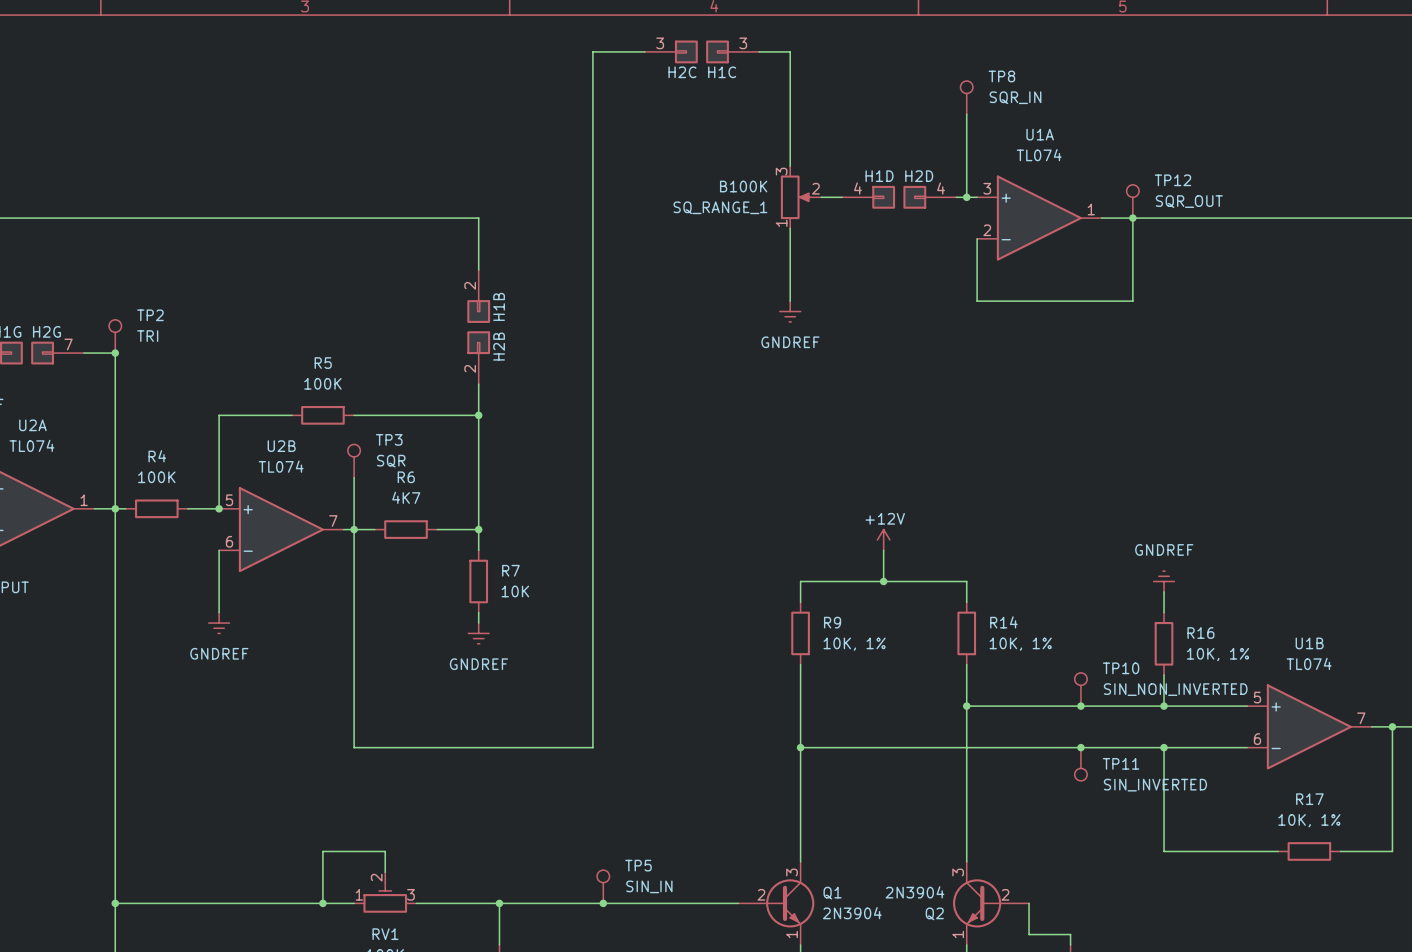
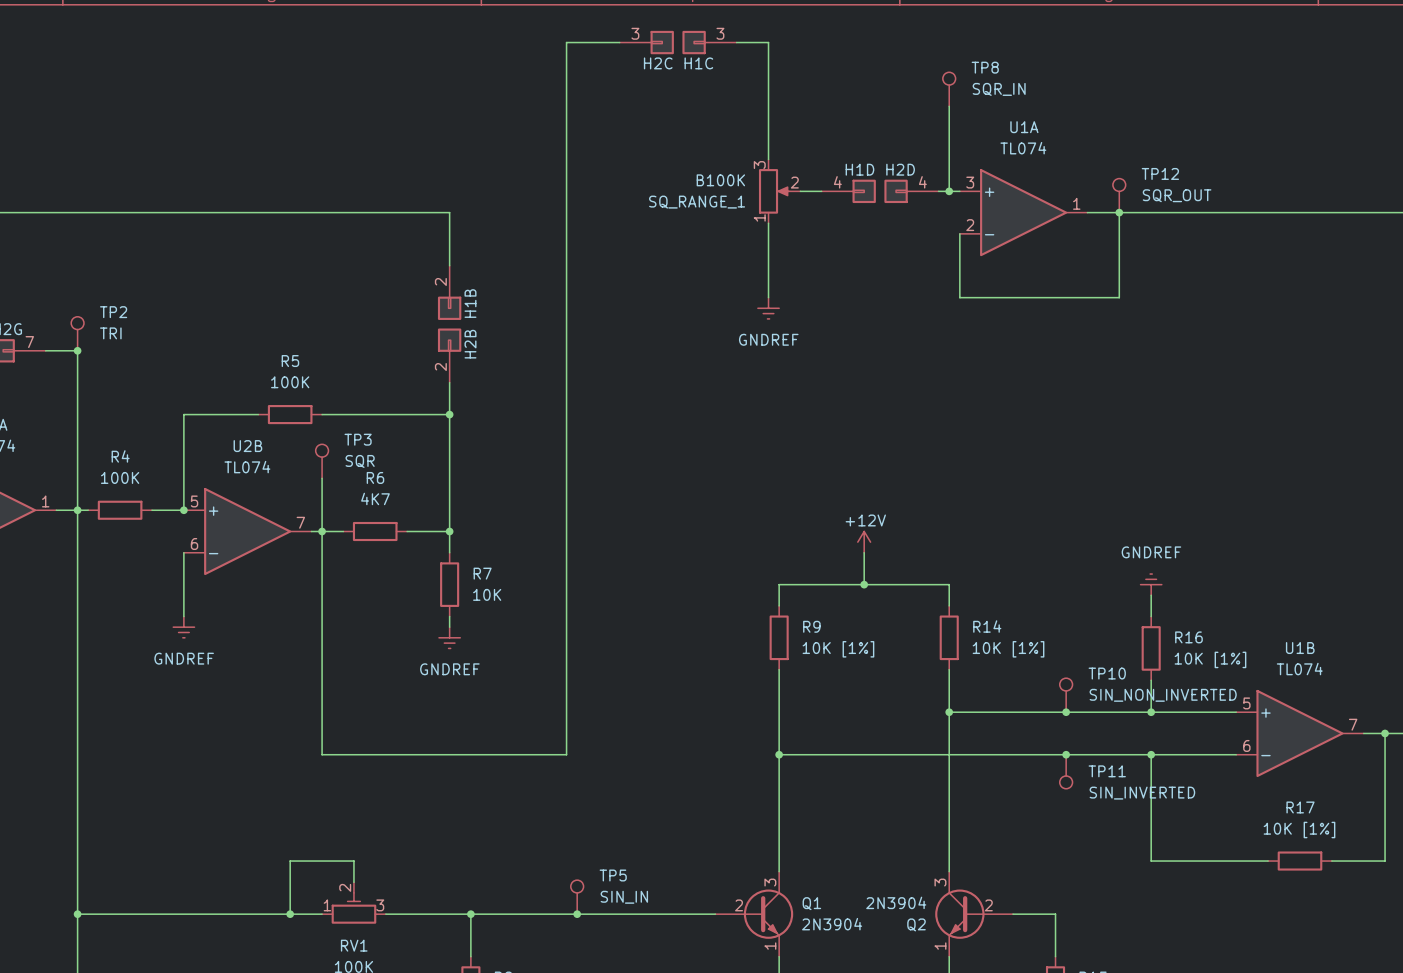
R9 value: 10K, 1% (854, 644) -> 10K [1%] (838, 649)
R14 value: 10K, 1% (1020, 644) -> 10K [1%] (1008, 649)
R16 value: 10K, 1% (1217, 654) -> 10K [1%] (1210, 659)
R17 value: 10K, 1% (1309, 820) -> 10K [1%] (1299, 830)
wire: (1029, 903) (1029, 934) (1070, 934) -> (1013, 914) (1055, 914) (1055, 946)

